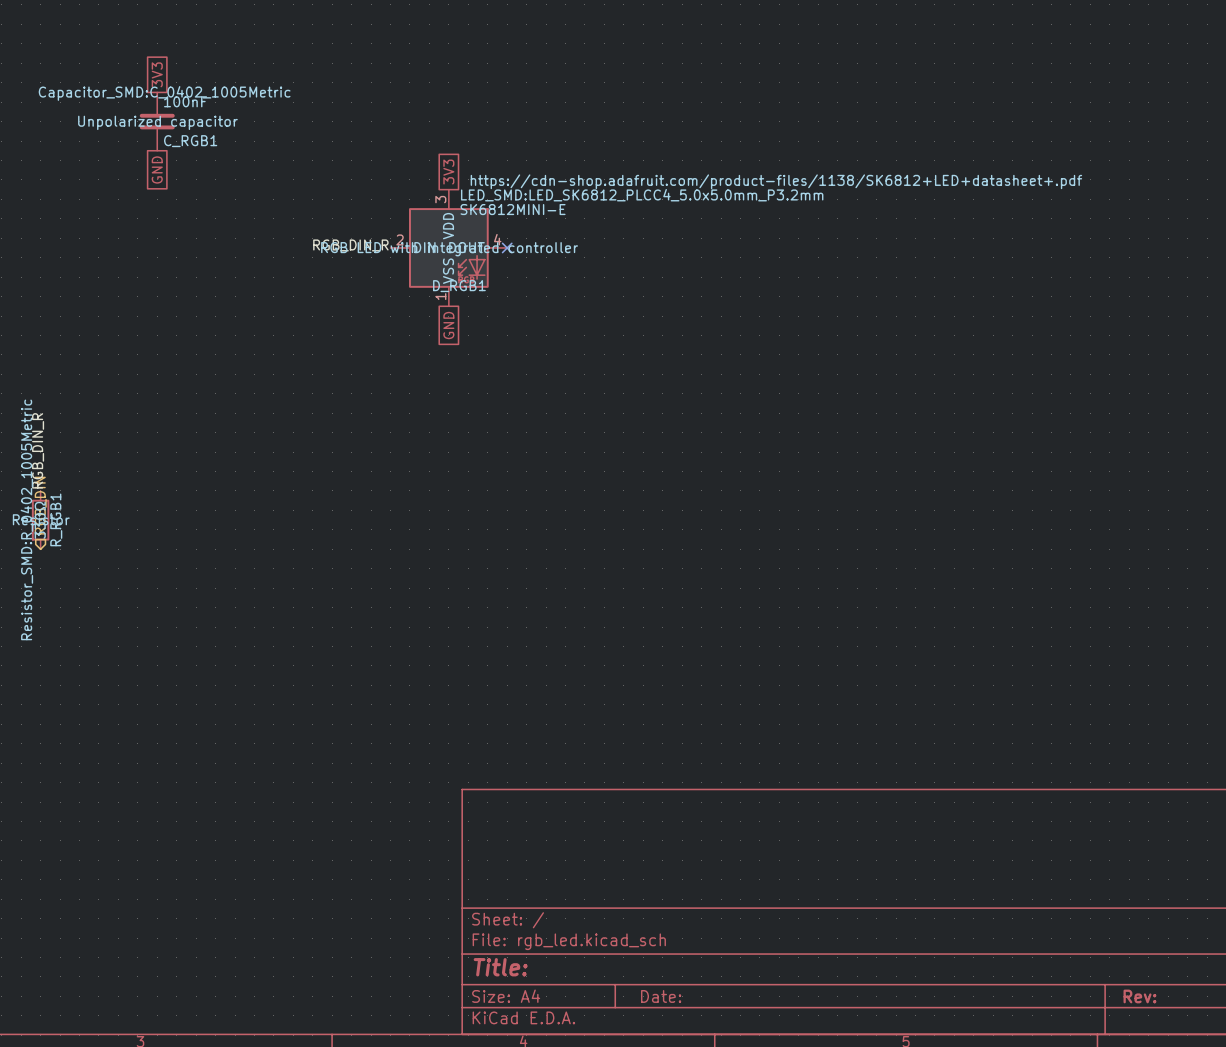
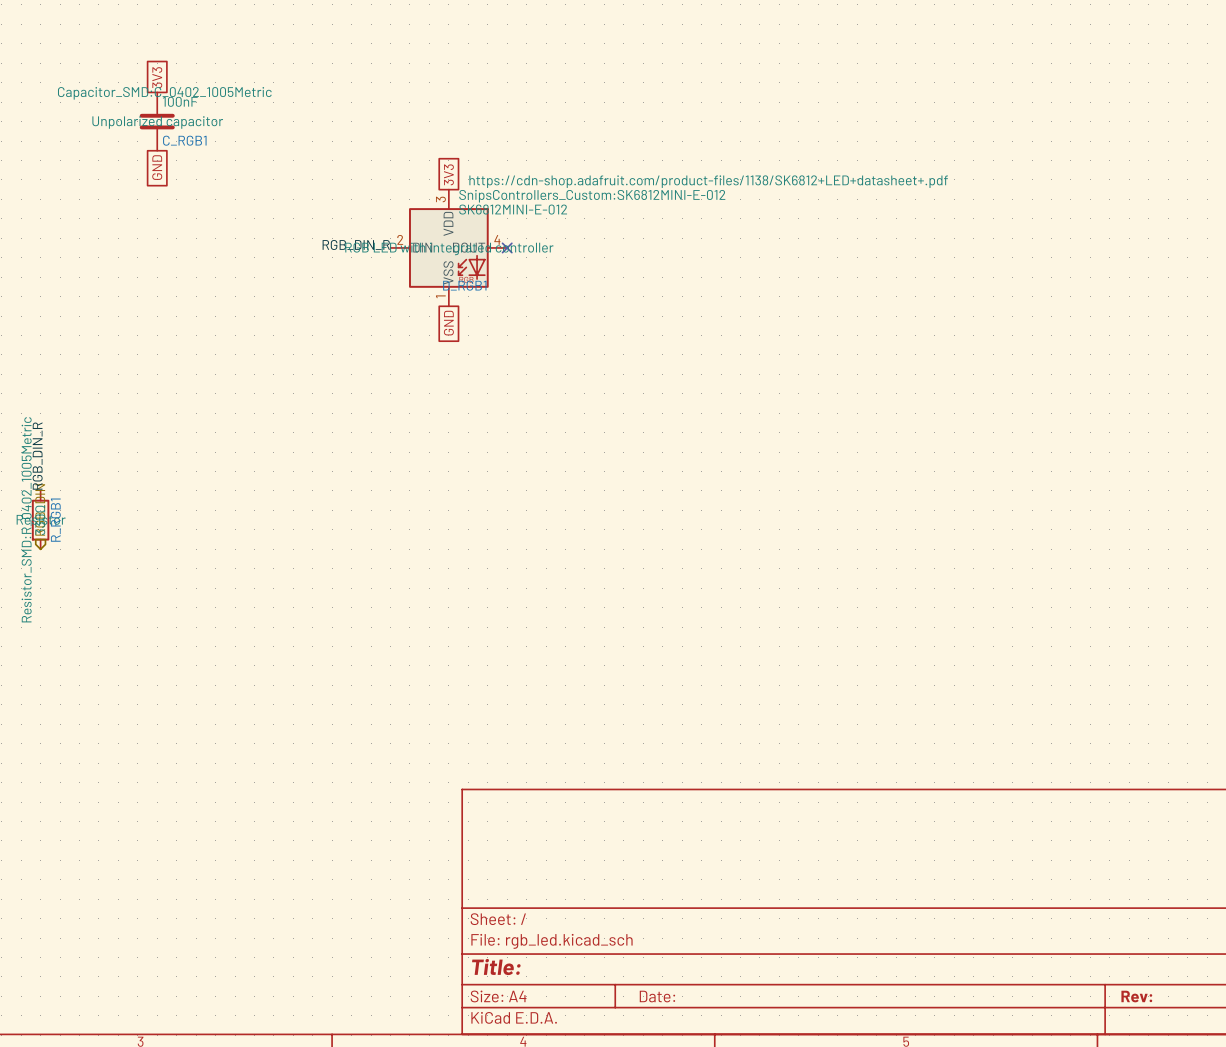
D_RGB1 text: LED_SMD:LED_SK6812_PLCC4_5.0x5.0mm_P3.2mm (642, 195) -> SnipsControllers_Custom:SK6812MINI-E-012 (592, 196)
D_RGB1 value: SK6812MINI-E (513, 209) -> SK6812MINI-E-012 (513, 209)

